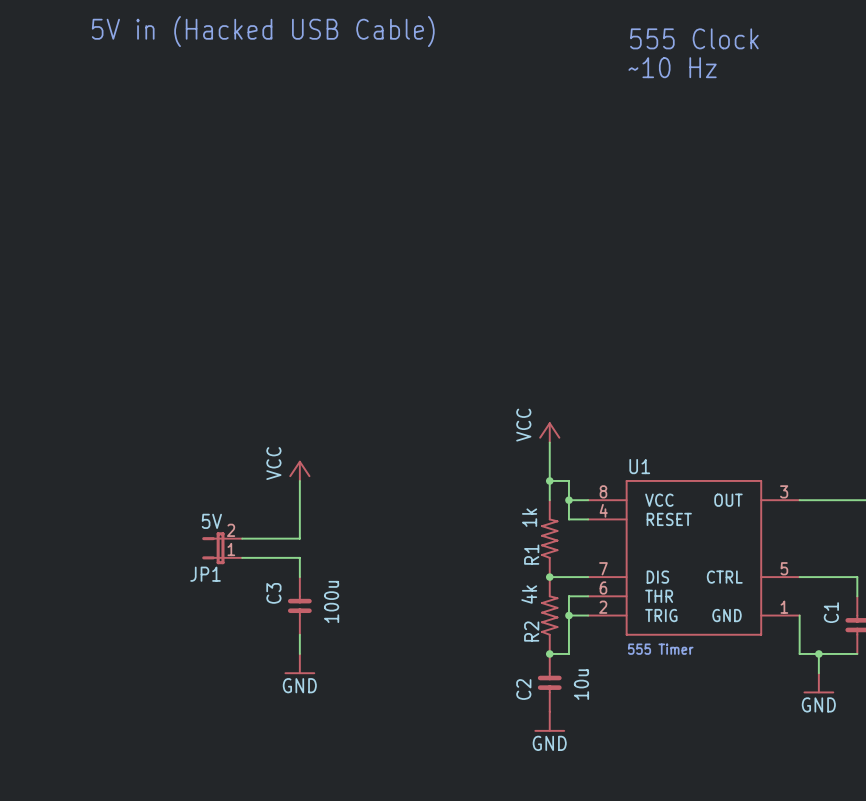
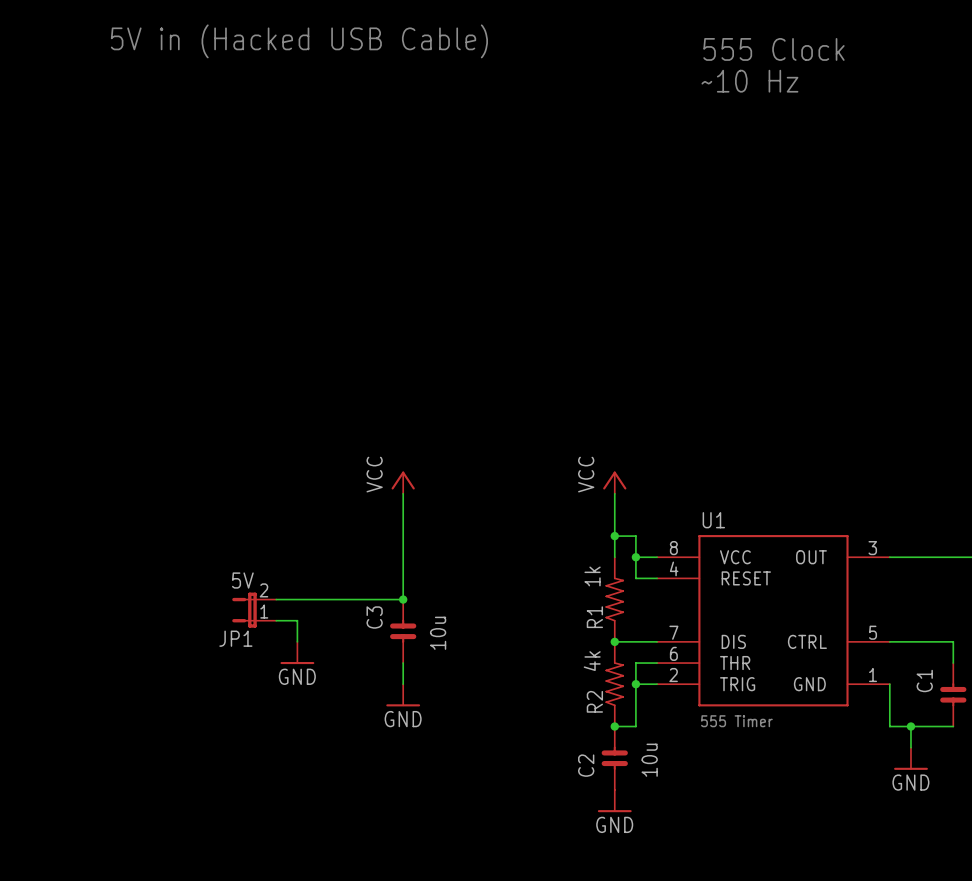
power symbol position: VCC (299, 470) -> VCC (403, 482)
wire: (299, 480) (299, 538) -> (403, 493) (403, 599) (339, 599)
junction: none -> (403, 599)
wire: (261, 557) (299, 557) (299, 577) -> (297, 620) (297, 641)
power symbol: none -> GND (297, 652)
C3 value: 100u (331, 601) -> 10u (438, 633)
C3 position: (299, 605) -> (403, 631)
power symbol: none -> GND (403, 695)
wire: (299, 634) (299, 653) -> (403, 663) (403, 684)
power symbol: GND (299, 664) -> none

